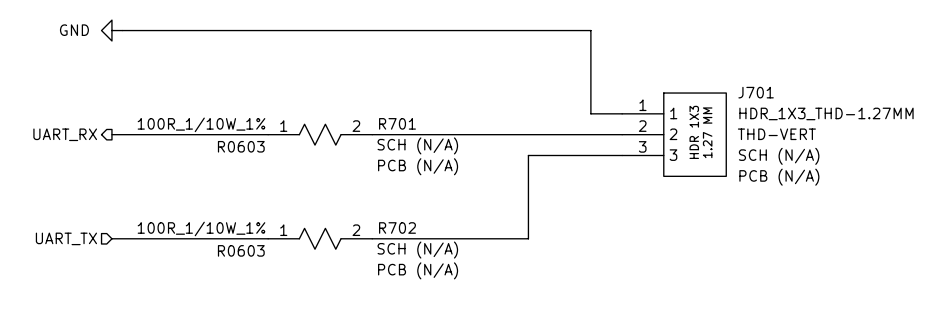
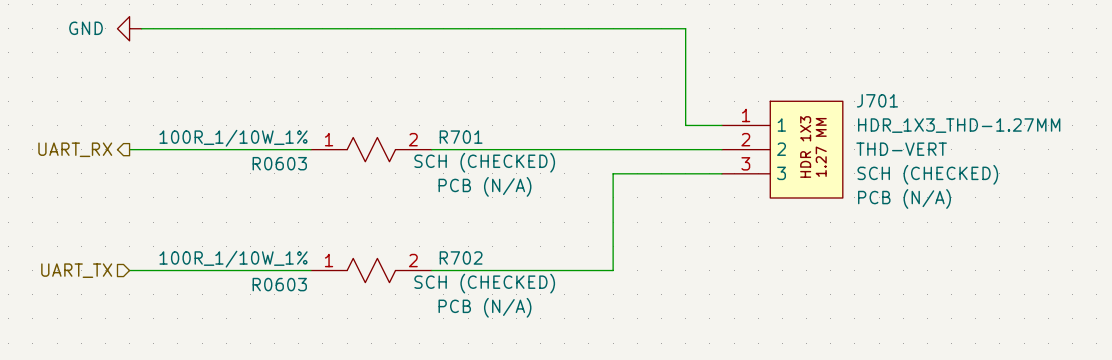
R701 text: SCH (N/A) (417, 145) -> SCH (CHECKED) (484, 162)
J701 text: SCH (N/A) (779, 156) -> SCH (CHECKED) (927, 174)
R702 text: SCH (N/A) (417, 250) -> SCH (CHECKED) (484, 283)

